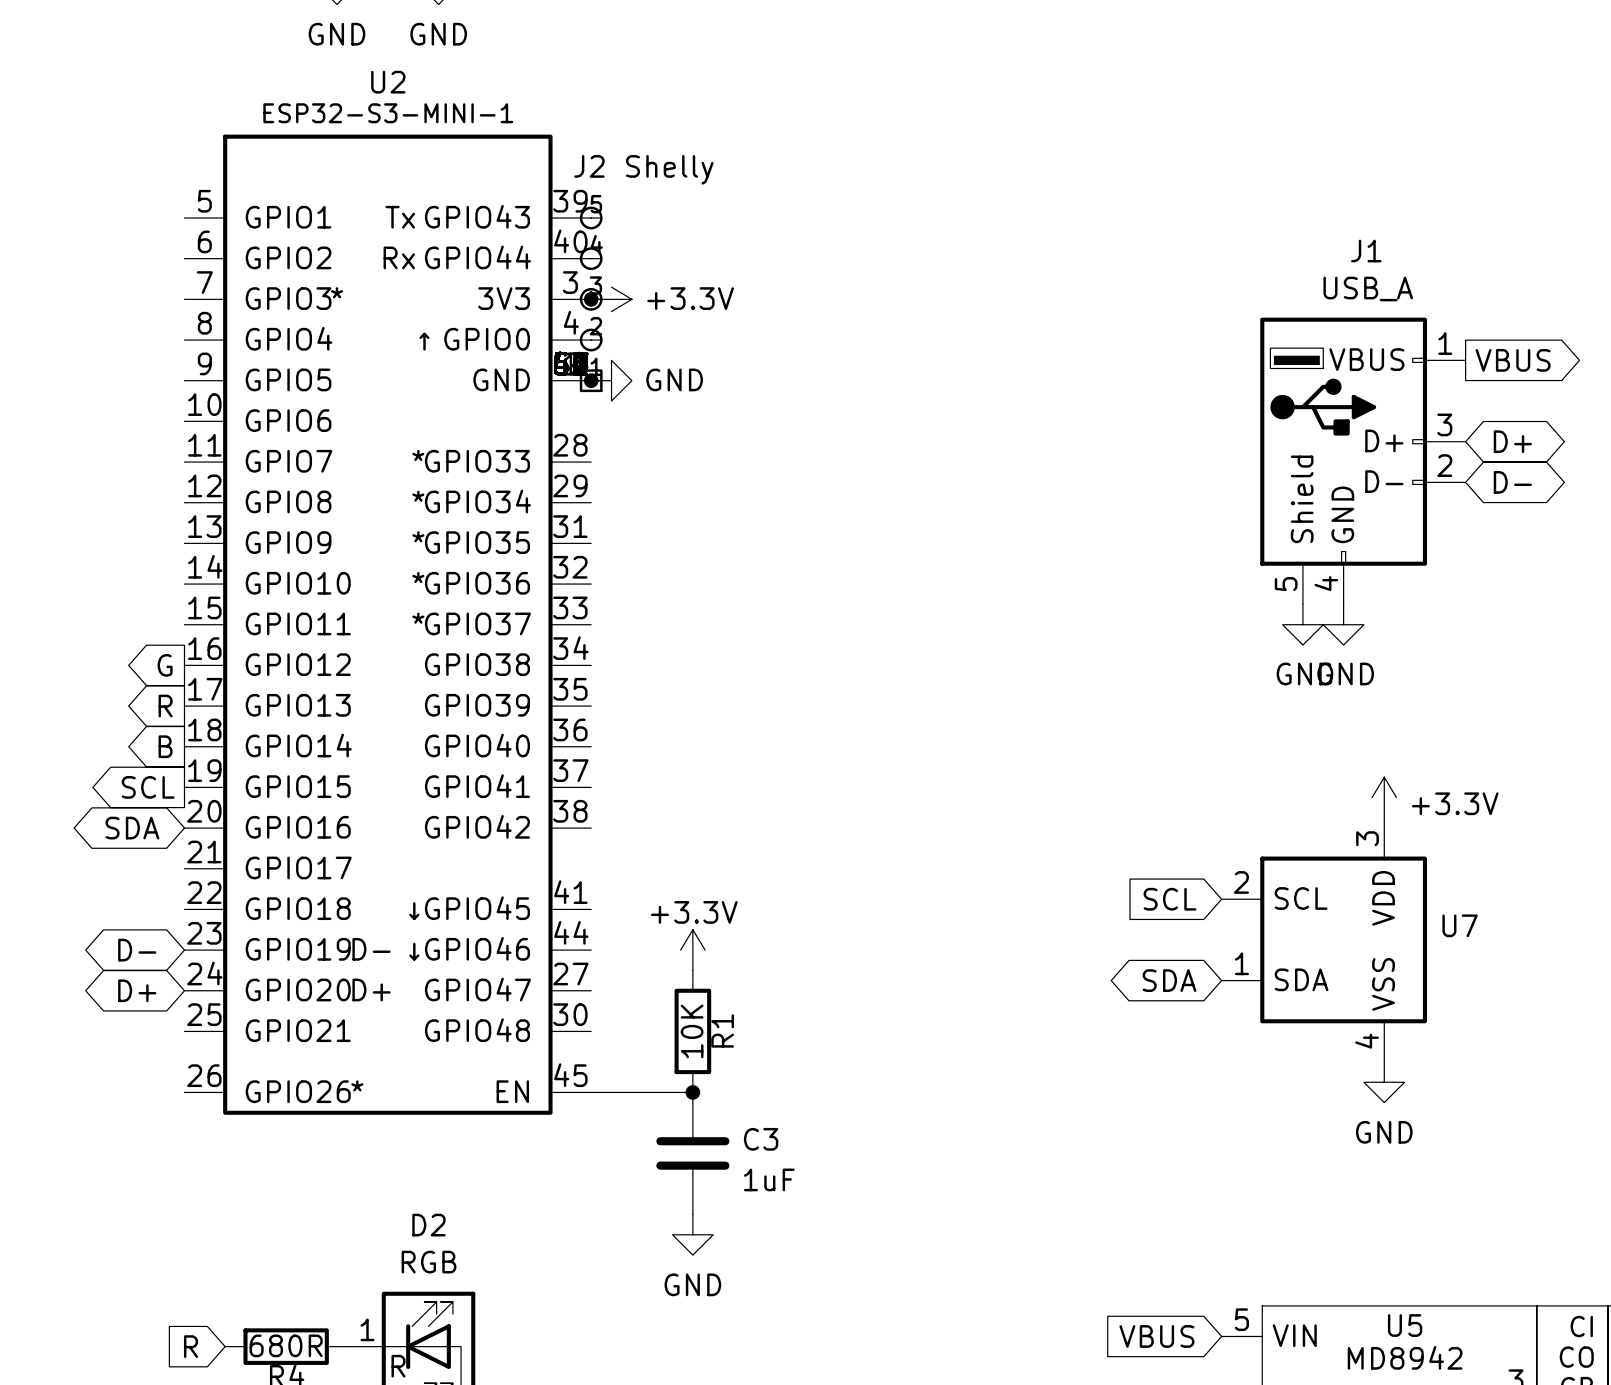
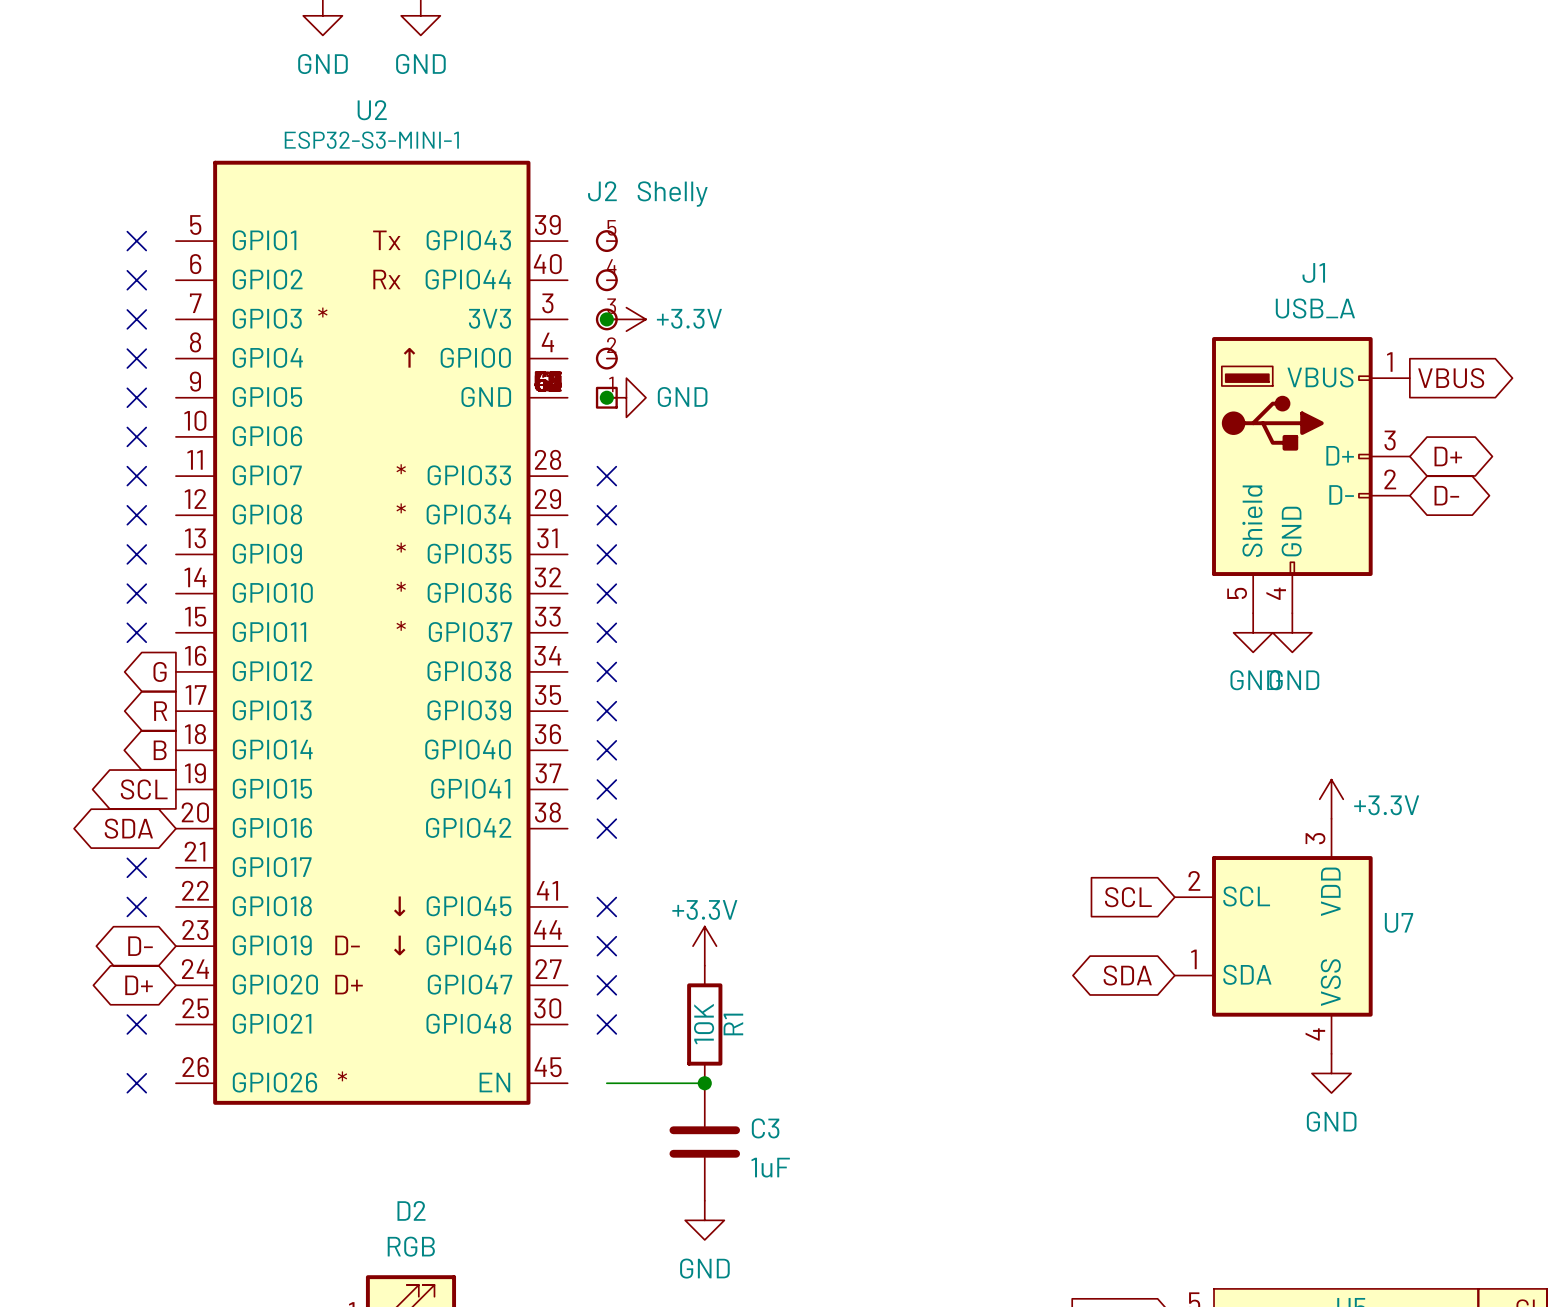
no-connect mark: none -> (136, 241)
no-connect mark: none -> (136, 280)
no-connect mark: none -> (136, 319)
junction position: (591, 299) -> (606, 319)
J2 position: (591, 299) -> (606, 319)
power symbol position: +3.3V (611, 299) -> +3.3V (626, 319)
no-connect mark: none -> (136, 358)
no-connect mark: none -> (136, 397)
junction position: (591, 380) -> (606, 397)
power symbol position: GND (611, 380) -> GND (626, 397)
no-connect mark: none -> (136, 436)
no-connect mark: none -> (136, 476)
no-connect mark: none -> (606, 476)
no-connect mark: none -> (136, 515)
no-connect mark: none -> (606, 515)
no-connect mark: none -> (136, 554)
no-connect mark: none -> (606, 554)
no-connect mark: none -> (136, 593)
no-connect mark: none -> (606, 593)
no-connect mark: none -> (136, 632)
no-connect mark: none -> (606, 632)
no-connect mark: none -> (606, 671)
no-connect mark: none -> (606, 711)
no-connect mark: none -> (606, 750)
no-connect mark: none -> (606, 789)
no-connect mark: none -> (606, 828)
no-connect mark: none -> (136, 867)
no-connect mark: none -> (136, 906)
no-connect mark: none -> (606, 906)
no-connect mark: none -> (606, 946)
power symbol position: +3.3V (692, 950) -> +3.3V (704, 946)
no-connect mark: none -> (606, 985)
no-connect mark: none -> (136, 1024)
no-connect mark: none -> (606, 1024)
R1 position: (692, 1031) -> (704, 1024)
no-connect mark: none -> (136, 1083)
wire: (591, 1092) (631, 1092) -> (665, 1083) (704, 1083)
junction position: (692, 1092) -> (704, 1083)
C3 position: (692, 1153) -> (704, 1142)
power symbol position: GND (692, 1234) -> GND (704, 1220)

